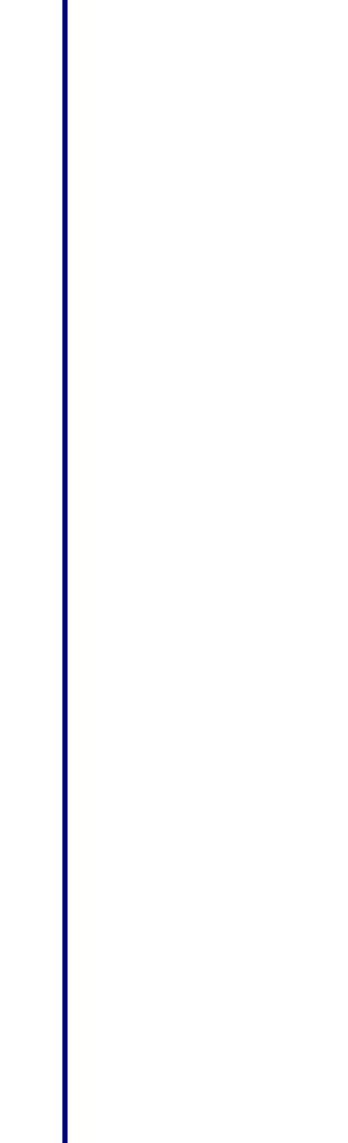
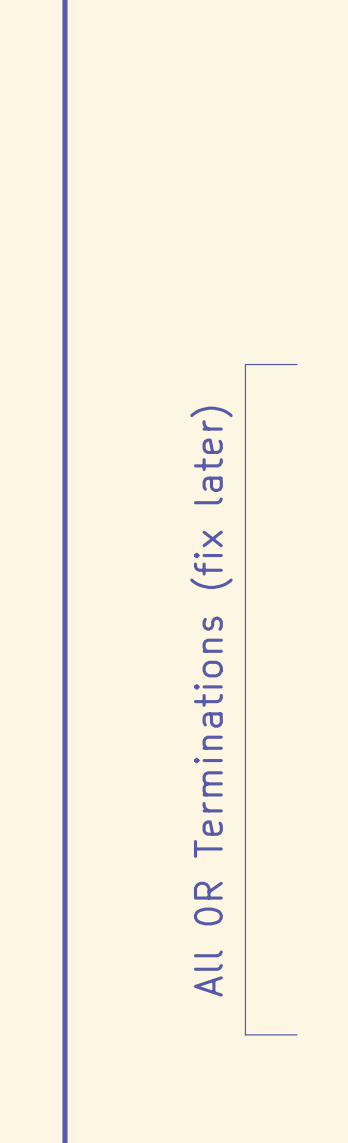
line: none -> (297, 364) (245, 364) (245, 1034) (297, 1034)
text: none -> All 0R Terminations (fix later) (211, 701)

